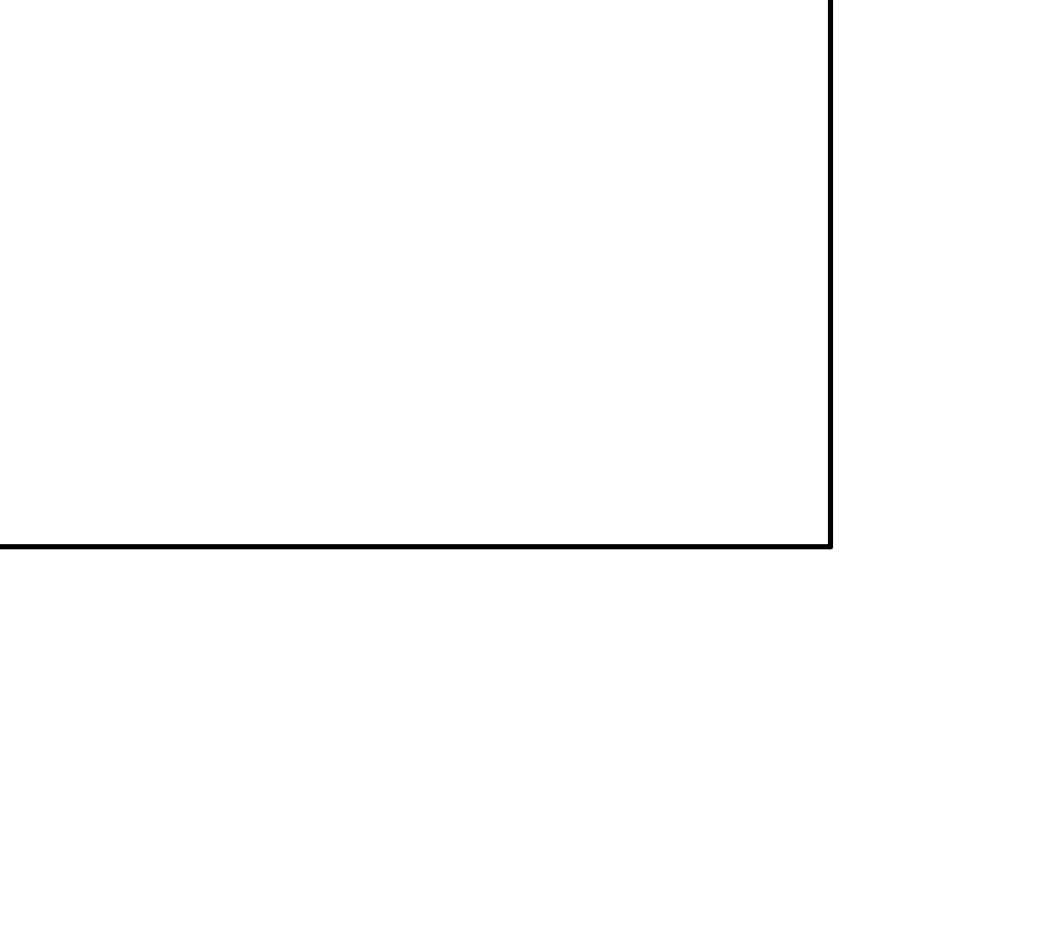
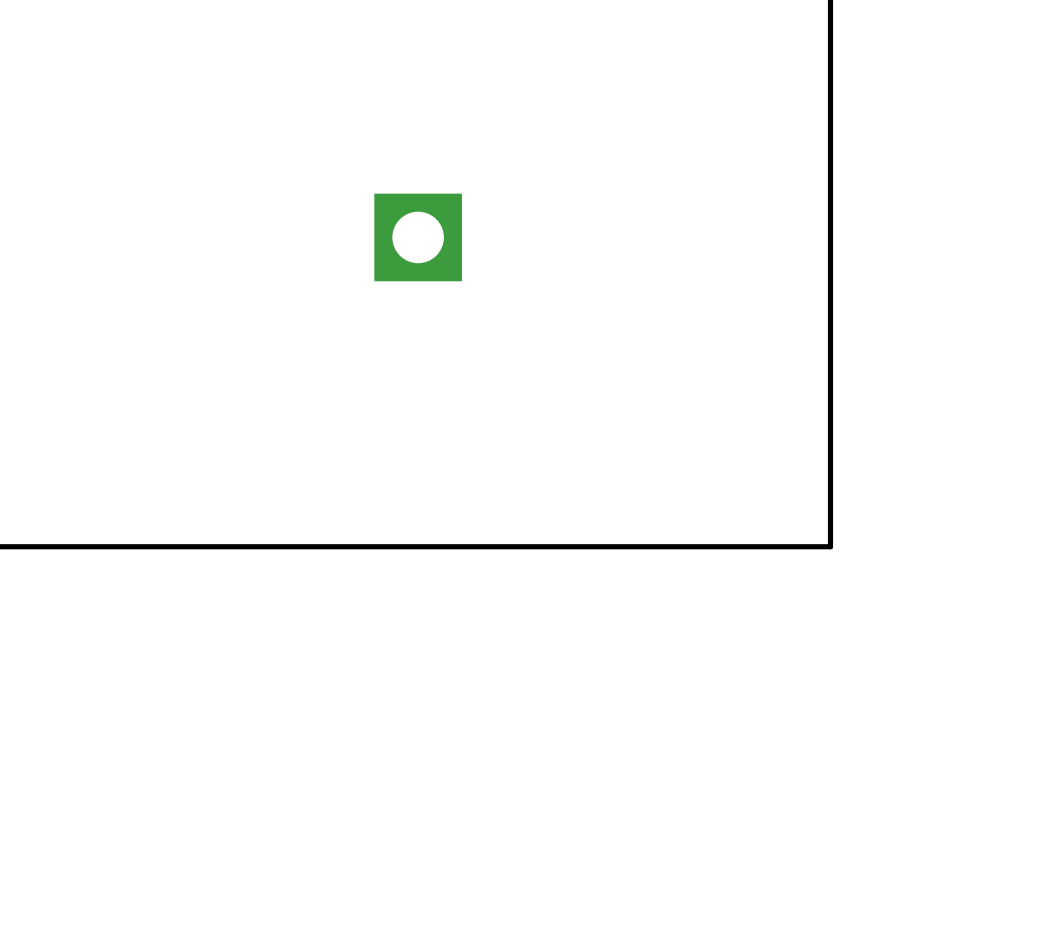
part: none -> (418, 237)

